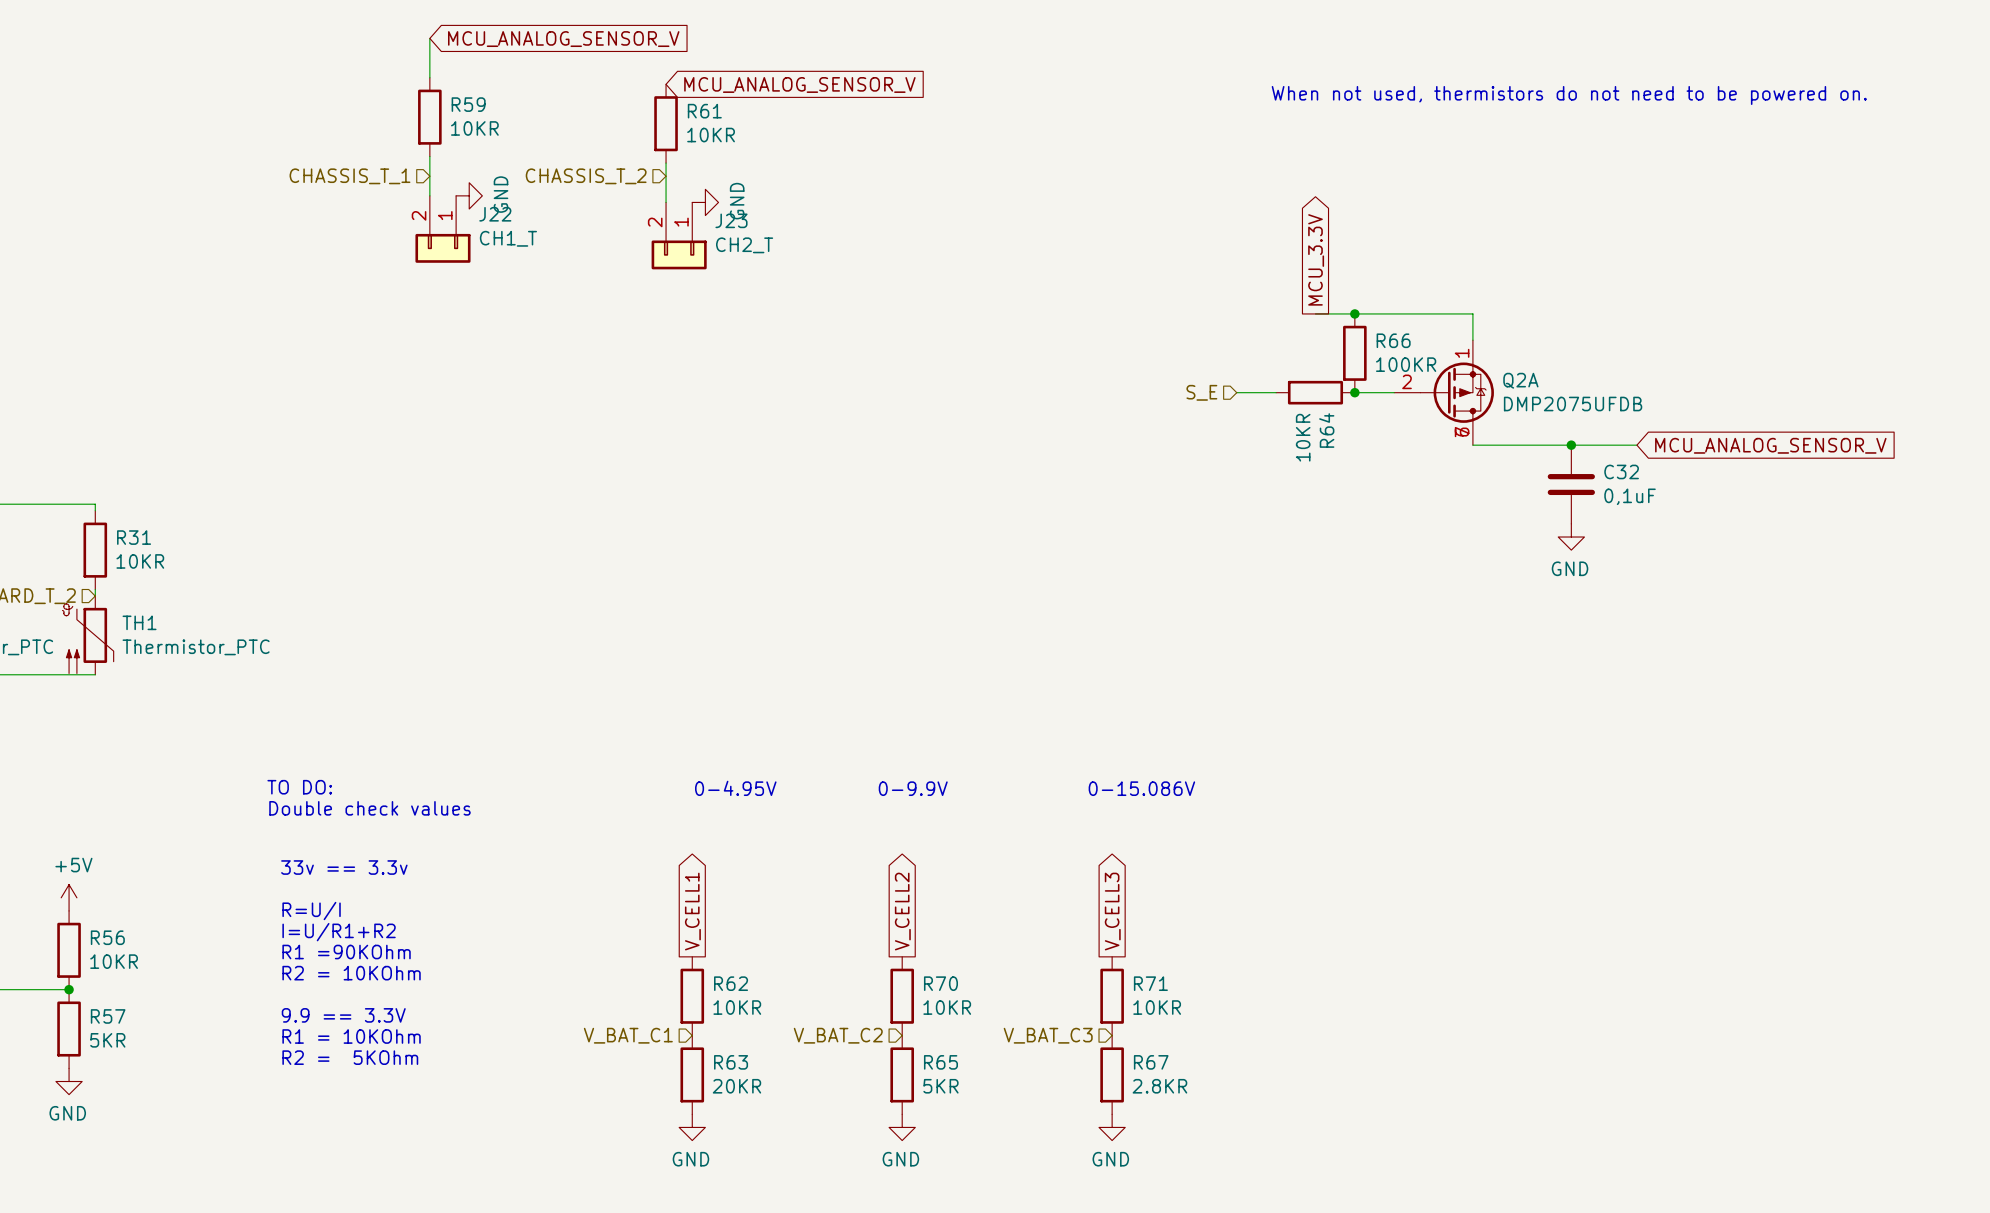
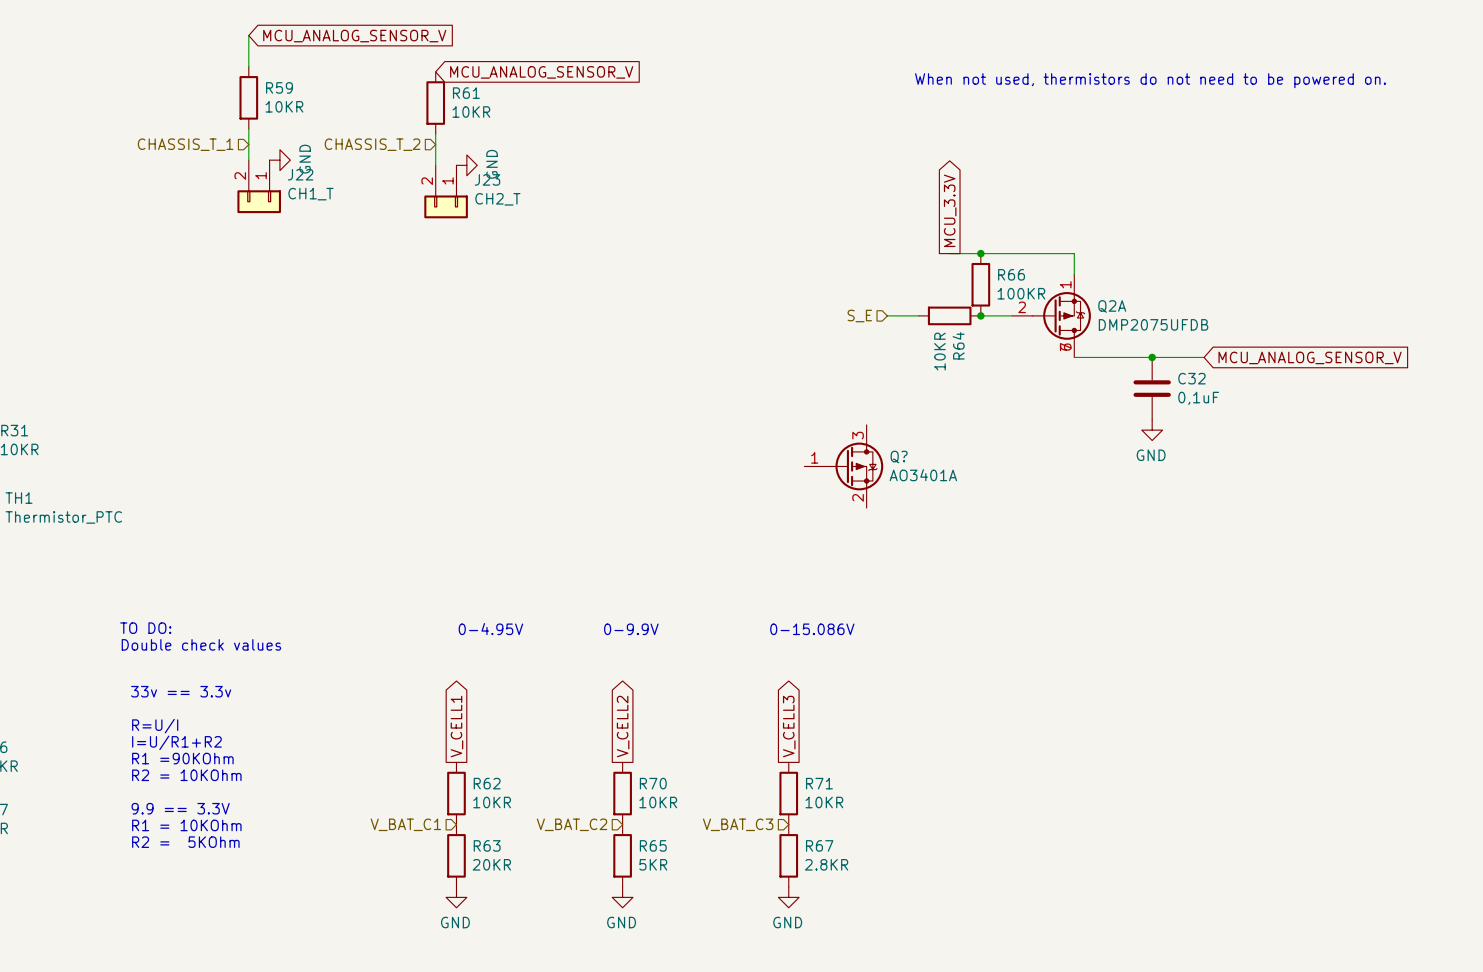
Q?: none -> AO3401A (843, 466)

